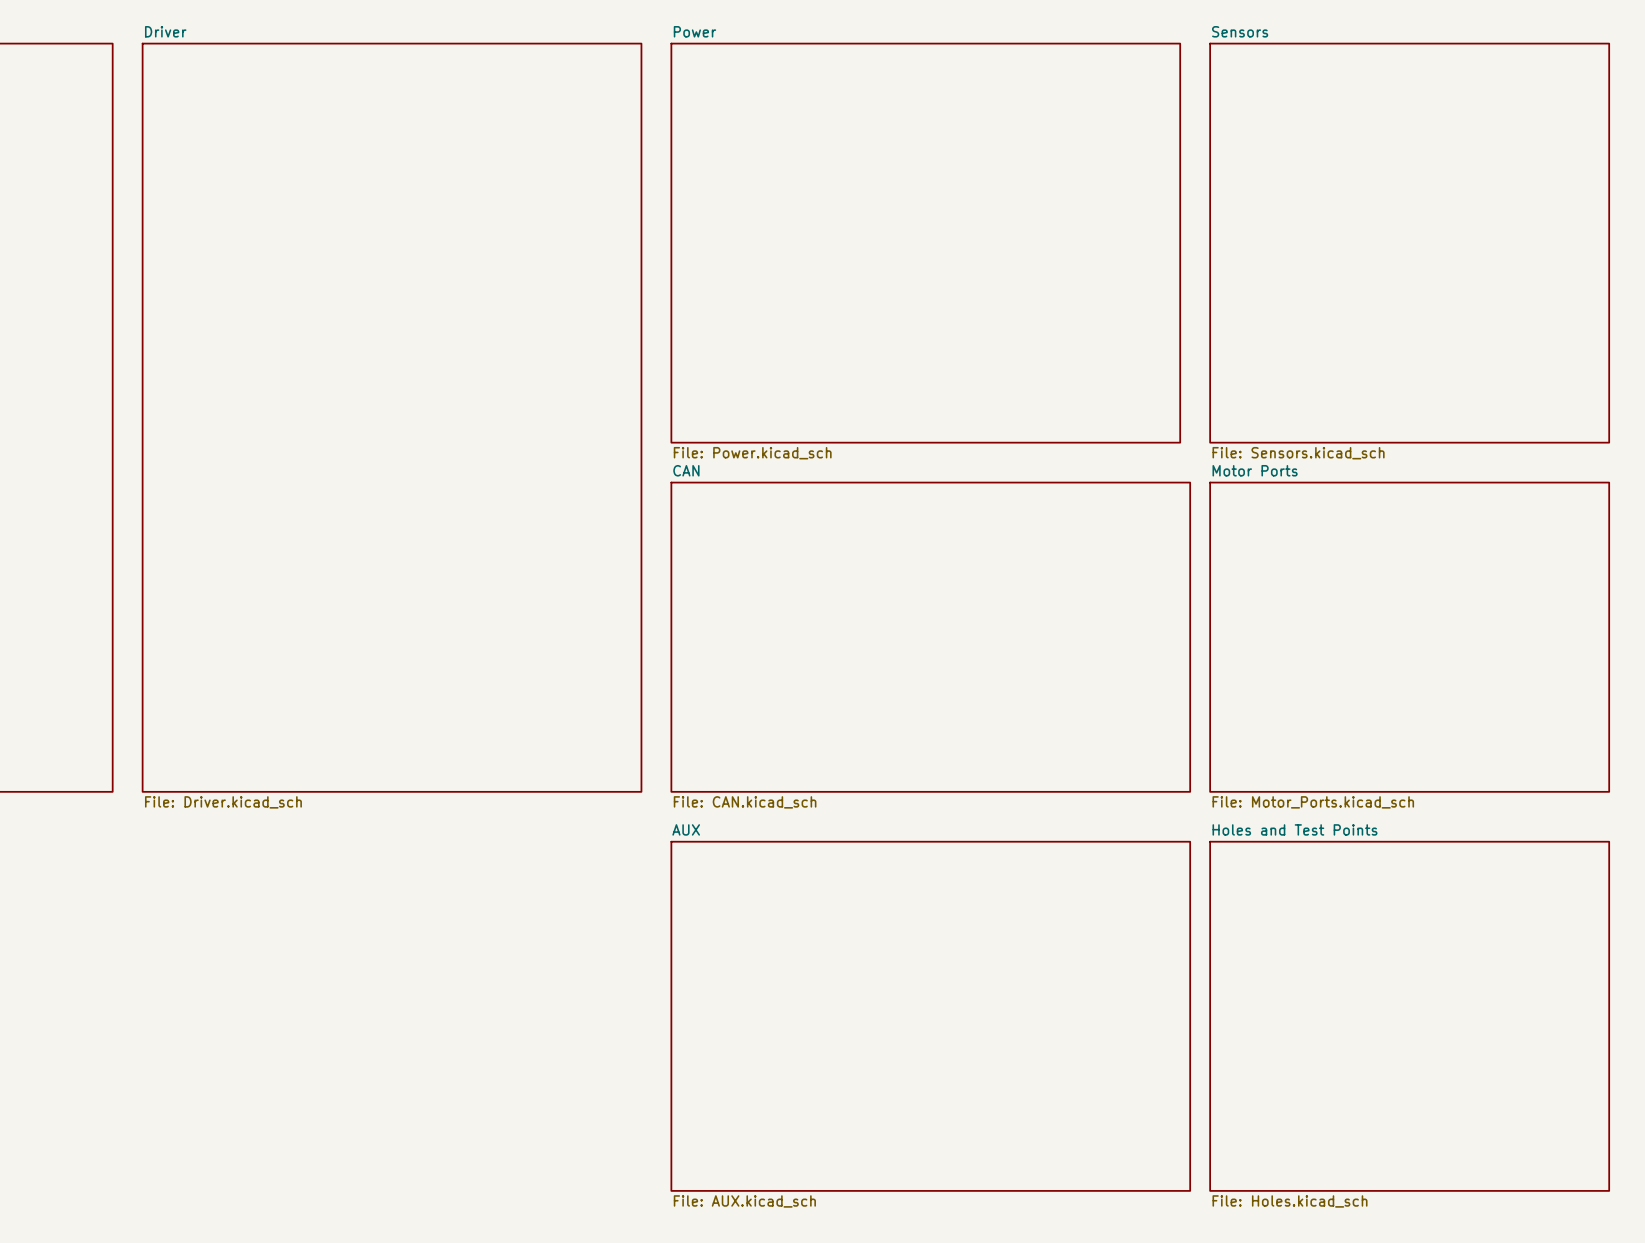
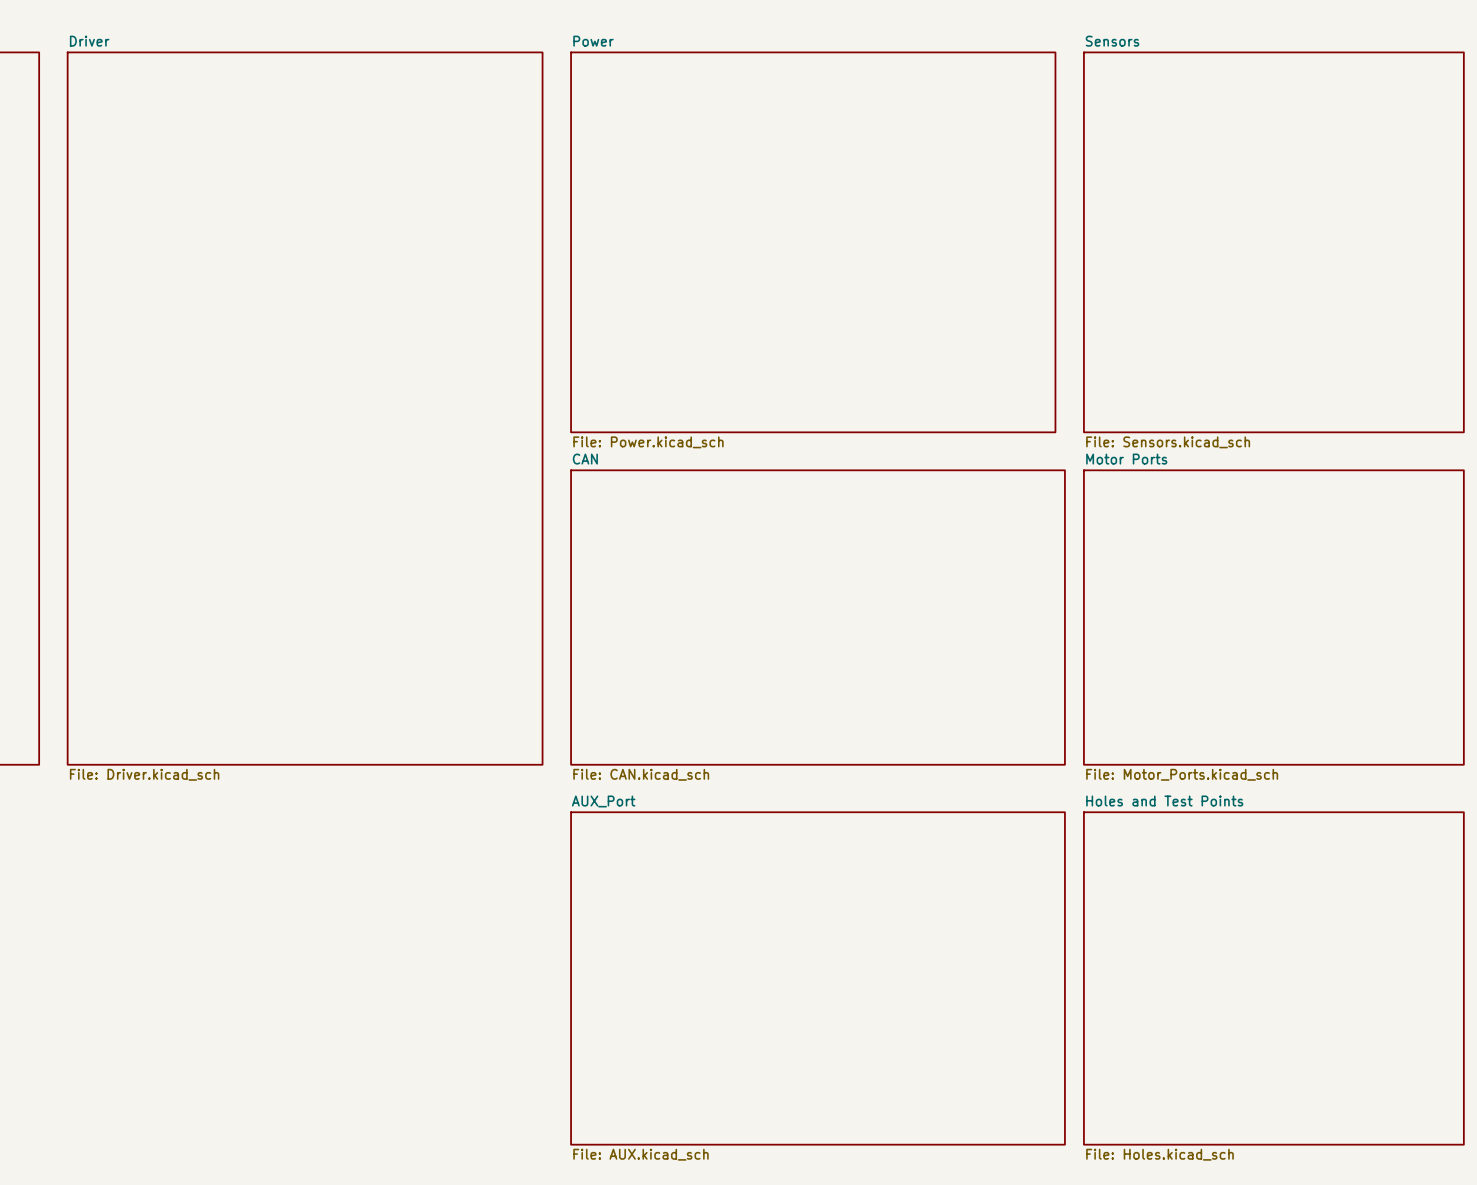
sheet AUX name: AUX (686, 829) -> AUX_Port (603, 801)

